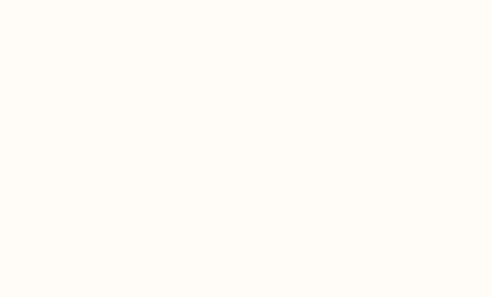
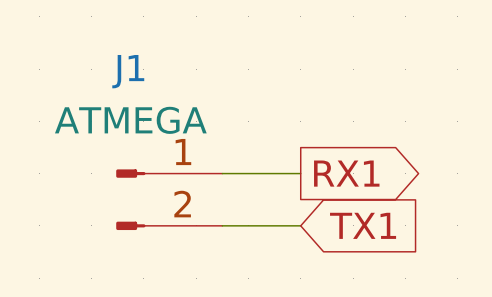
wire: none -> (222, 173) (300, 173)
global label: none -> RX1 (346, 173)
J1: none -> ATMEGA (169, 199)
wire: none -> (222, 225) (300, 225)
global label: none -> TX1 (363, 225)

